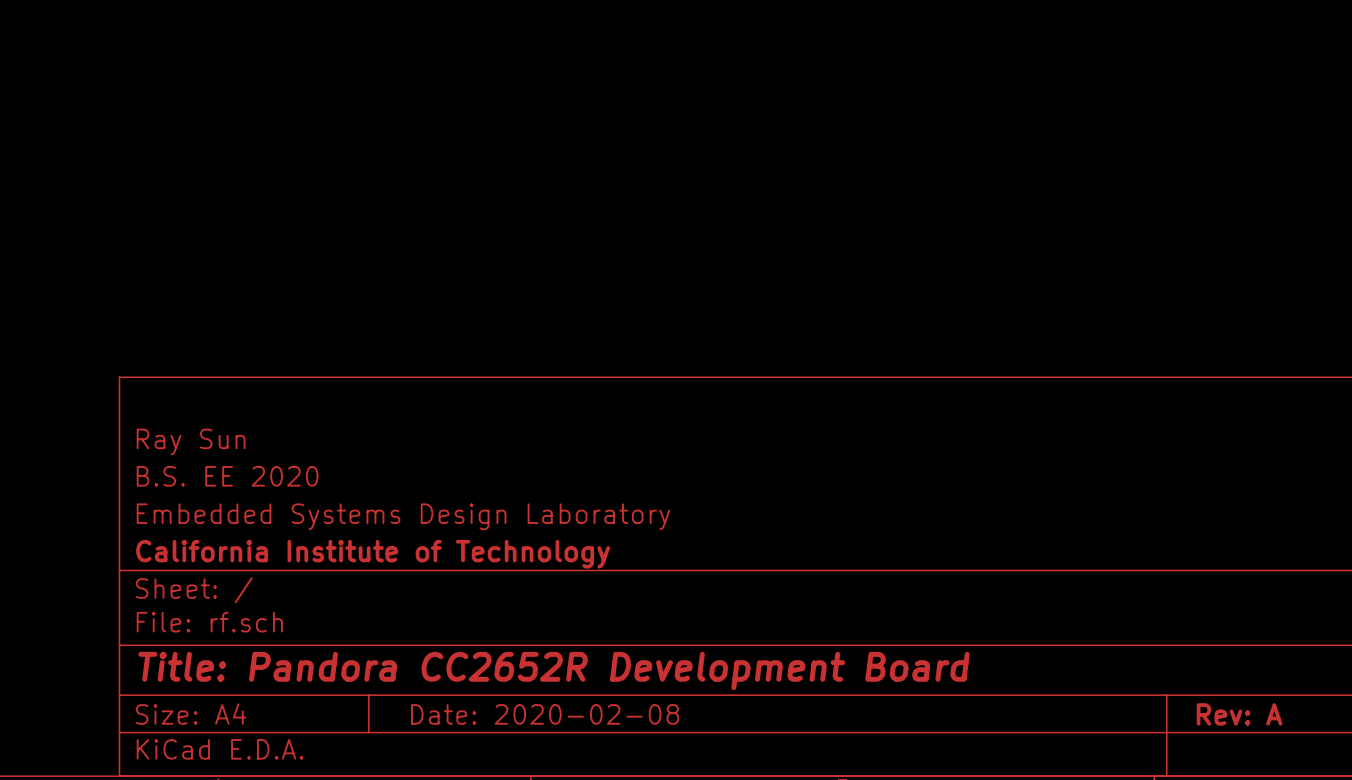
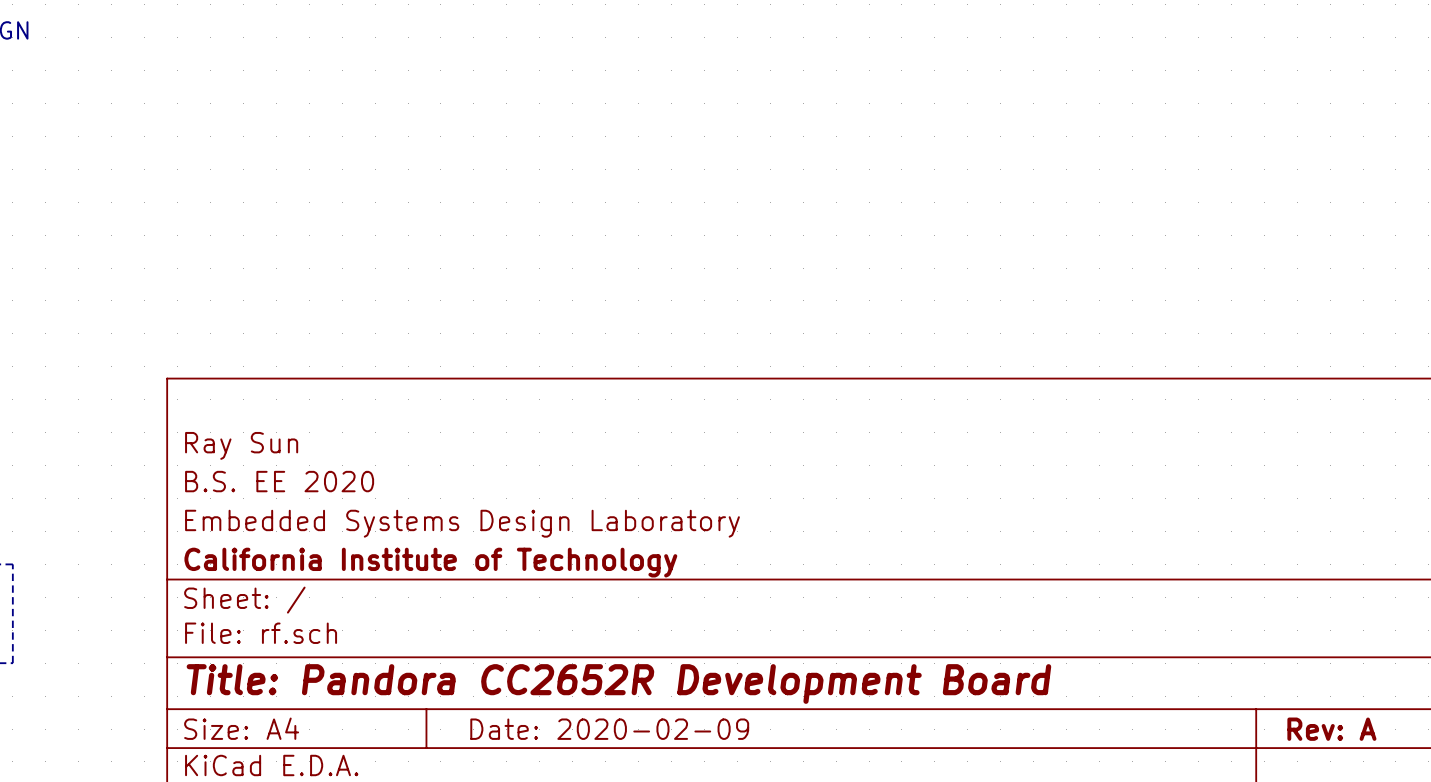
title block: Date: 2020-02-08 (545, 714) -> Date: 2020-02-09 (609, 729)

